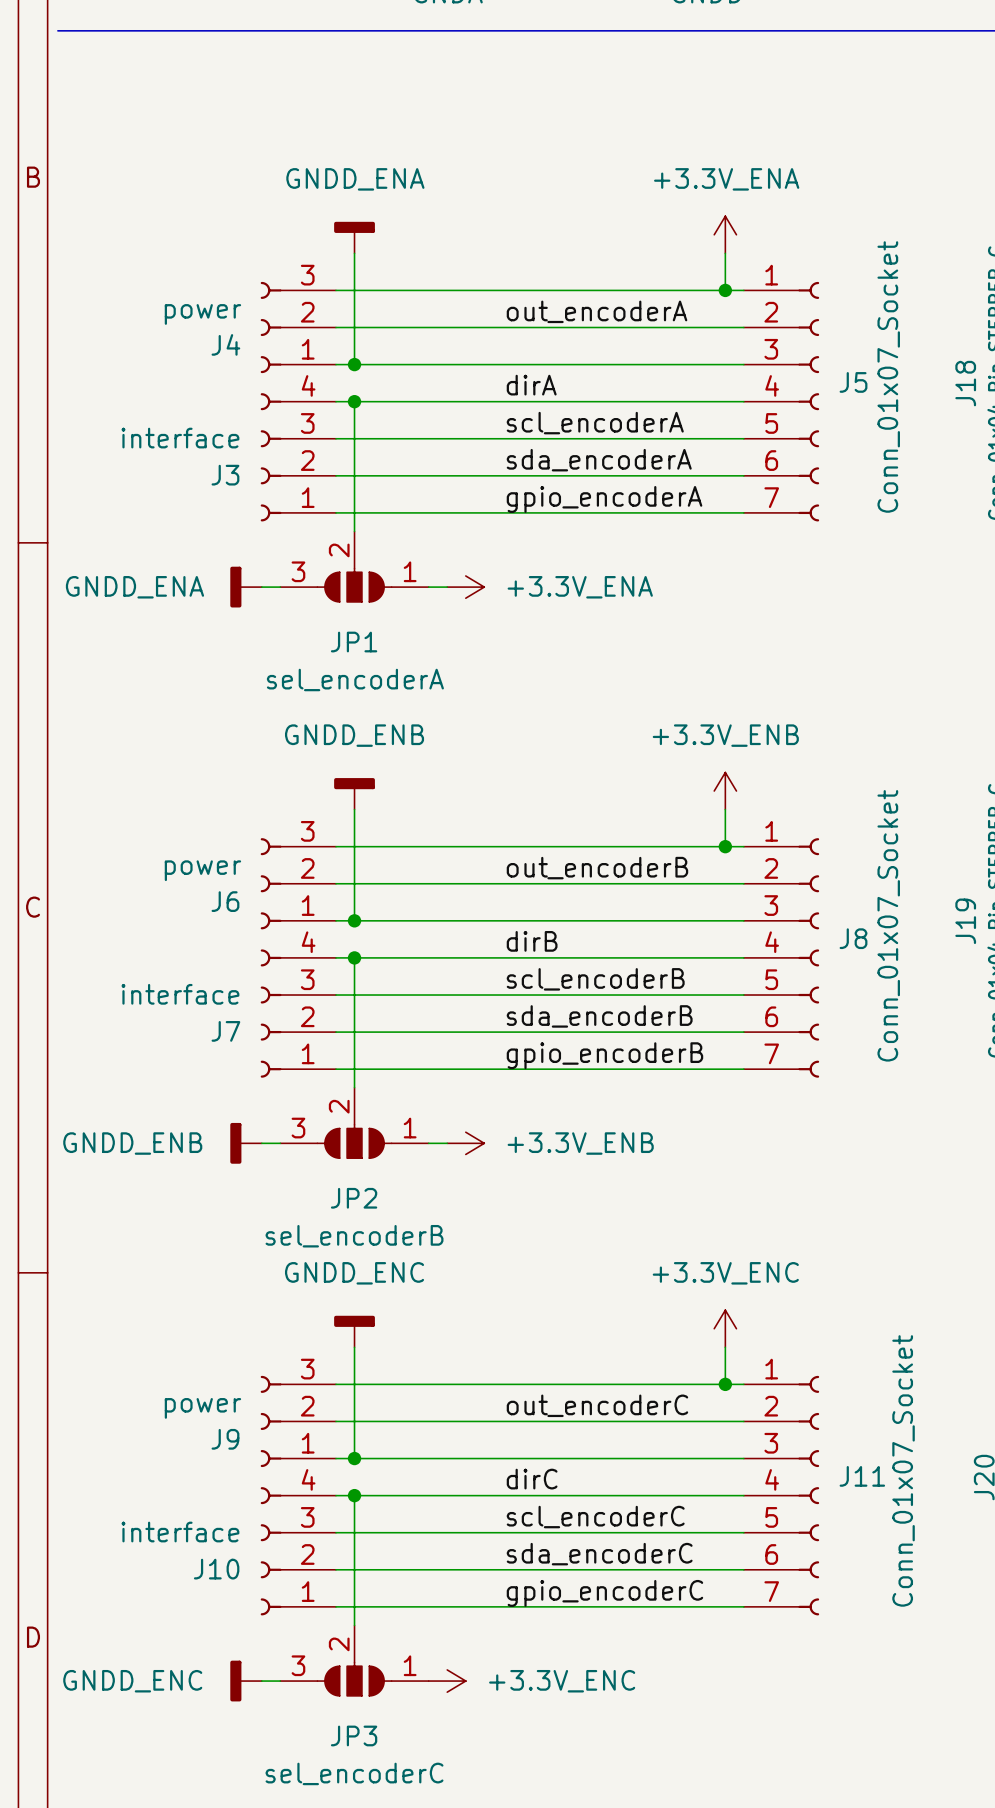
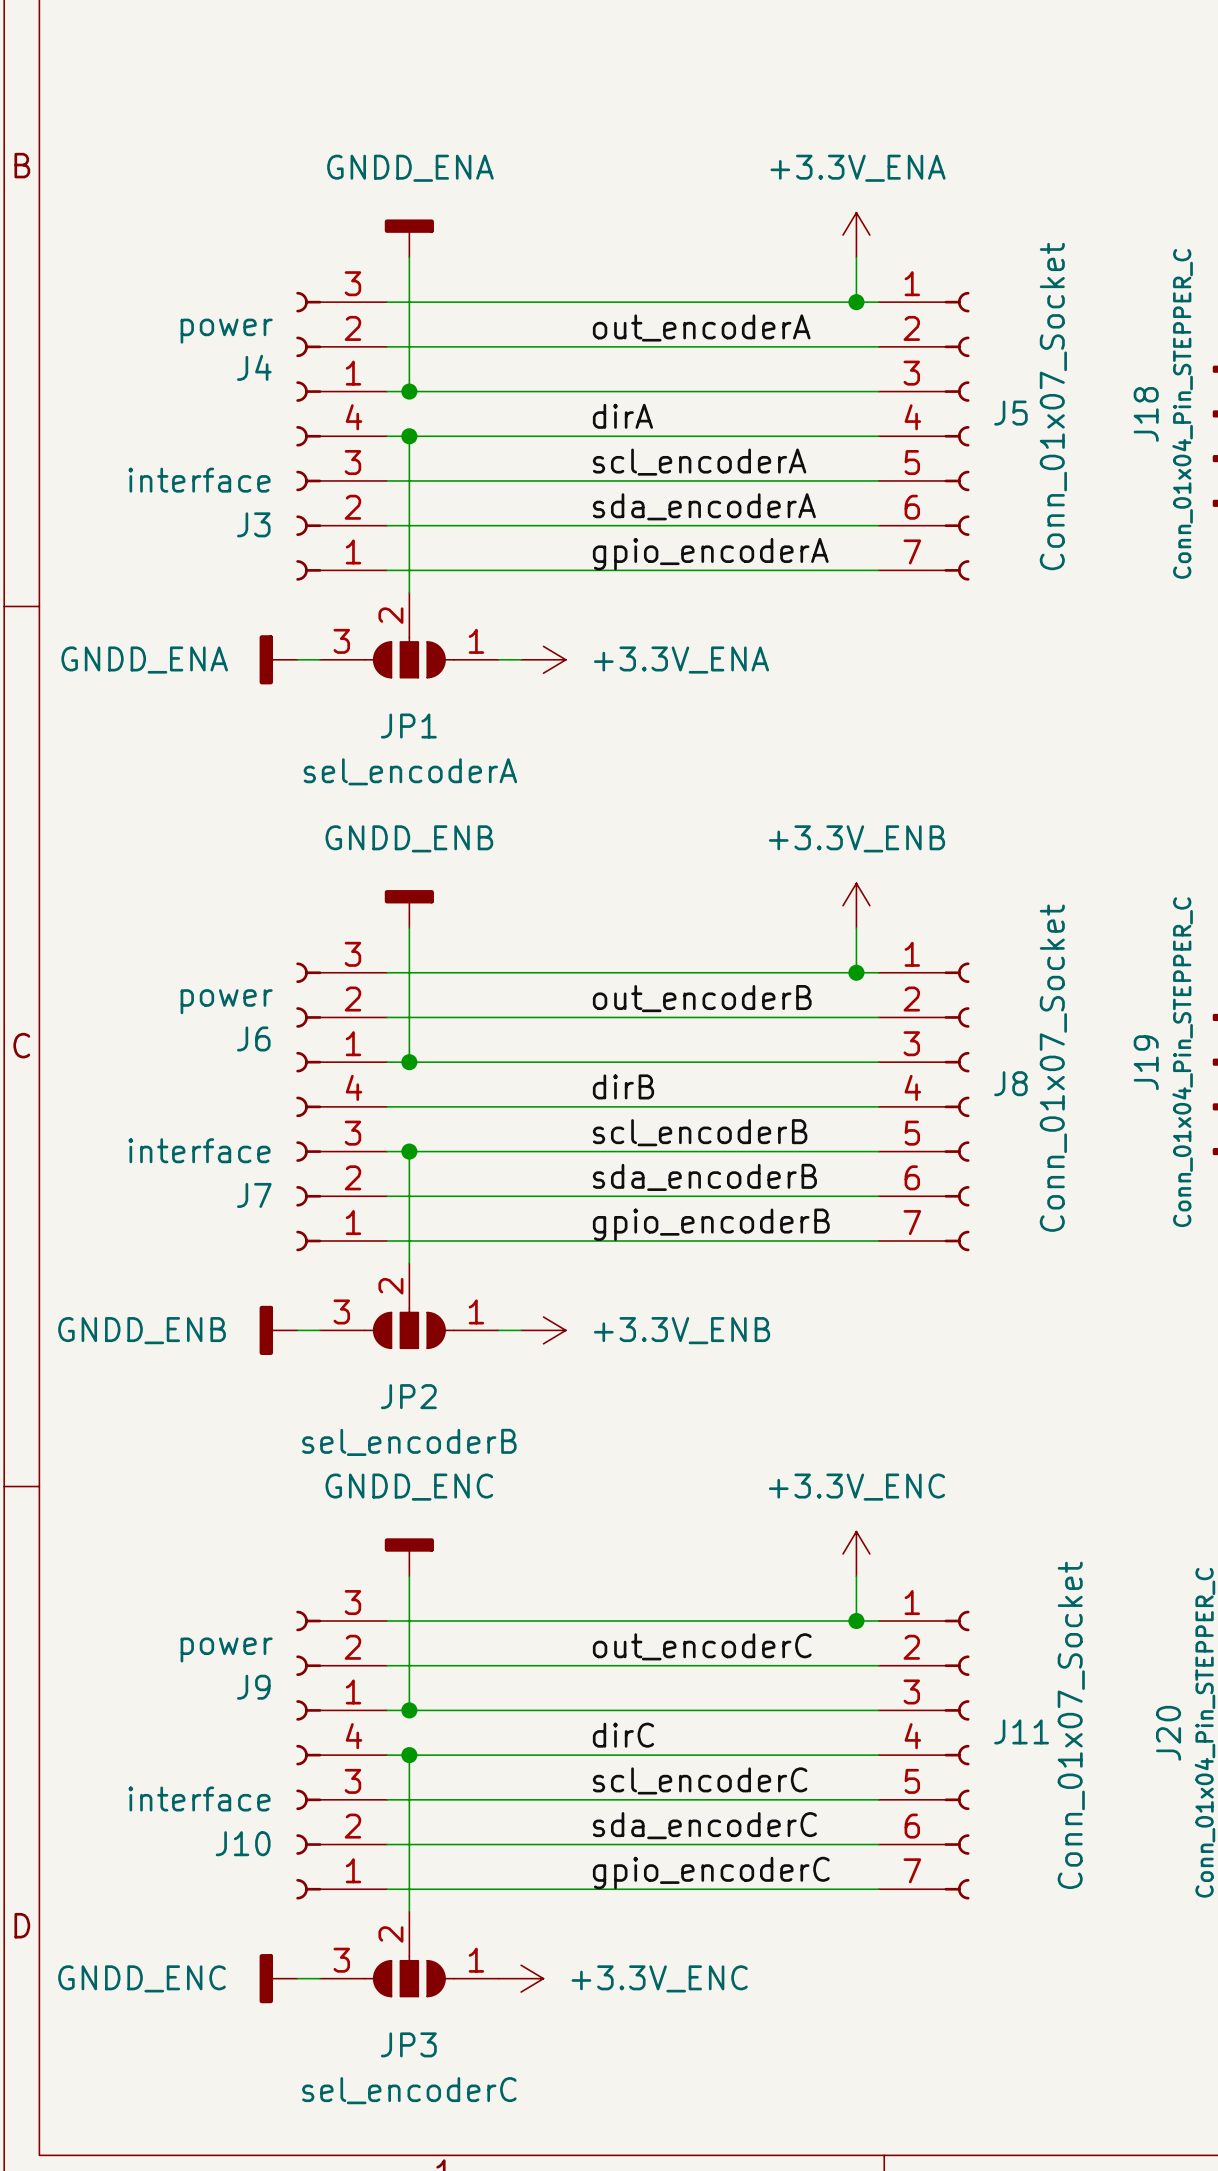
wire: (354, 957) (354, 995) -> none
junction position: (354, 957) -> (409, 1151)

